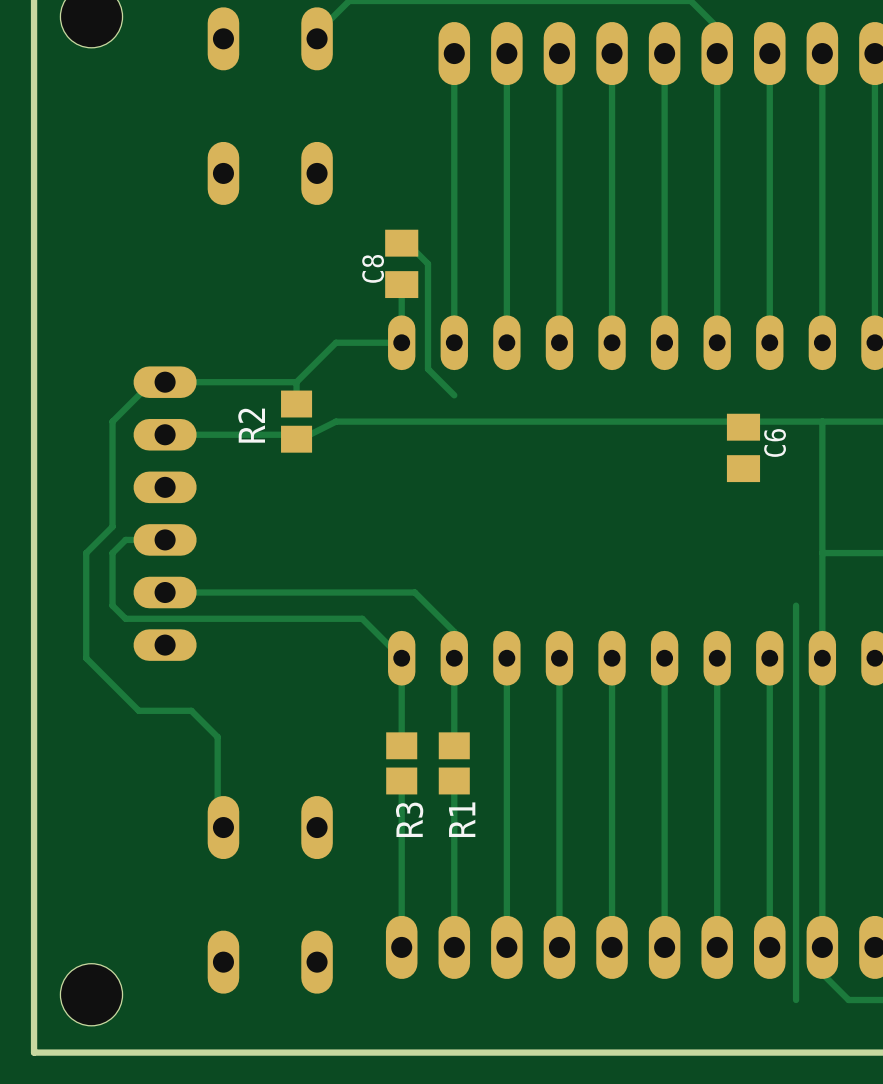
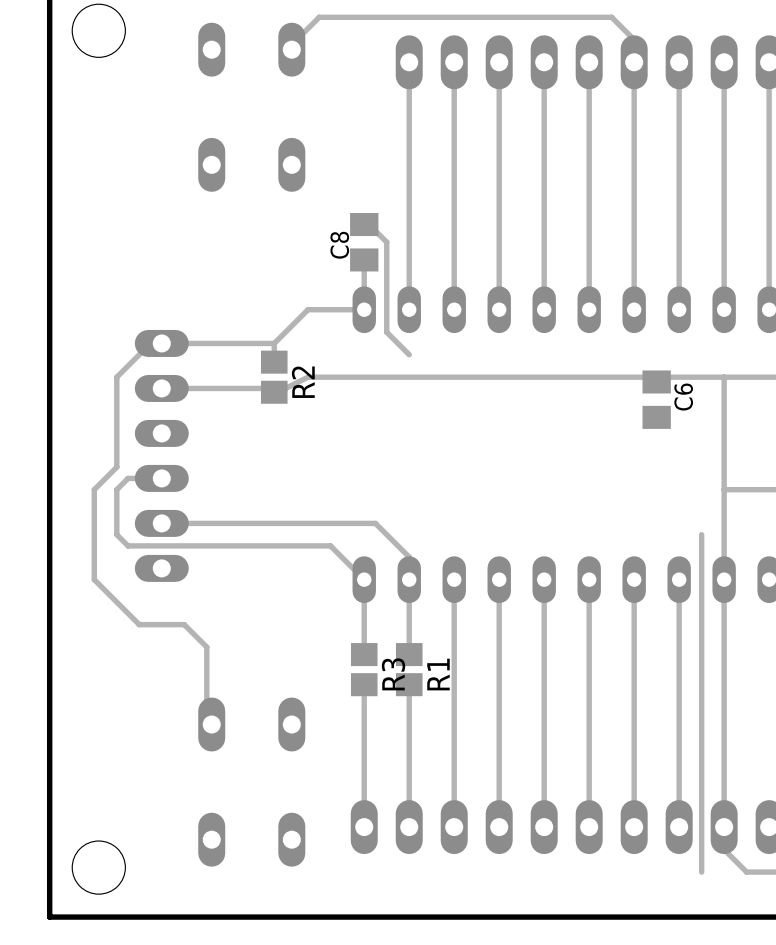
R2 name position: R2 (251, 425) -> R2 (303, 382)
R3 name position: R3 (409, 819) -> R3 (393, 674)
R1 name position: R1 (462, 819) -> R1 (438, 674)

